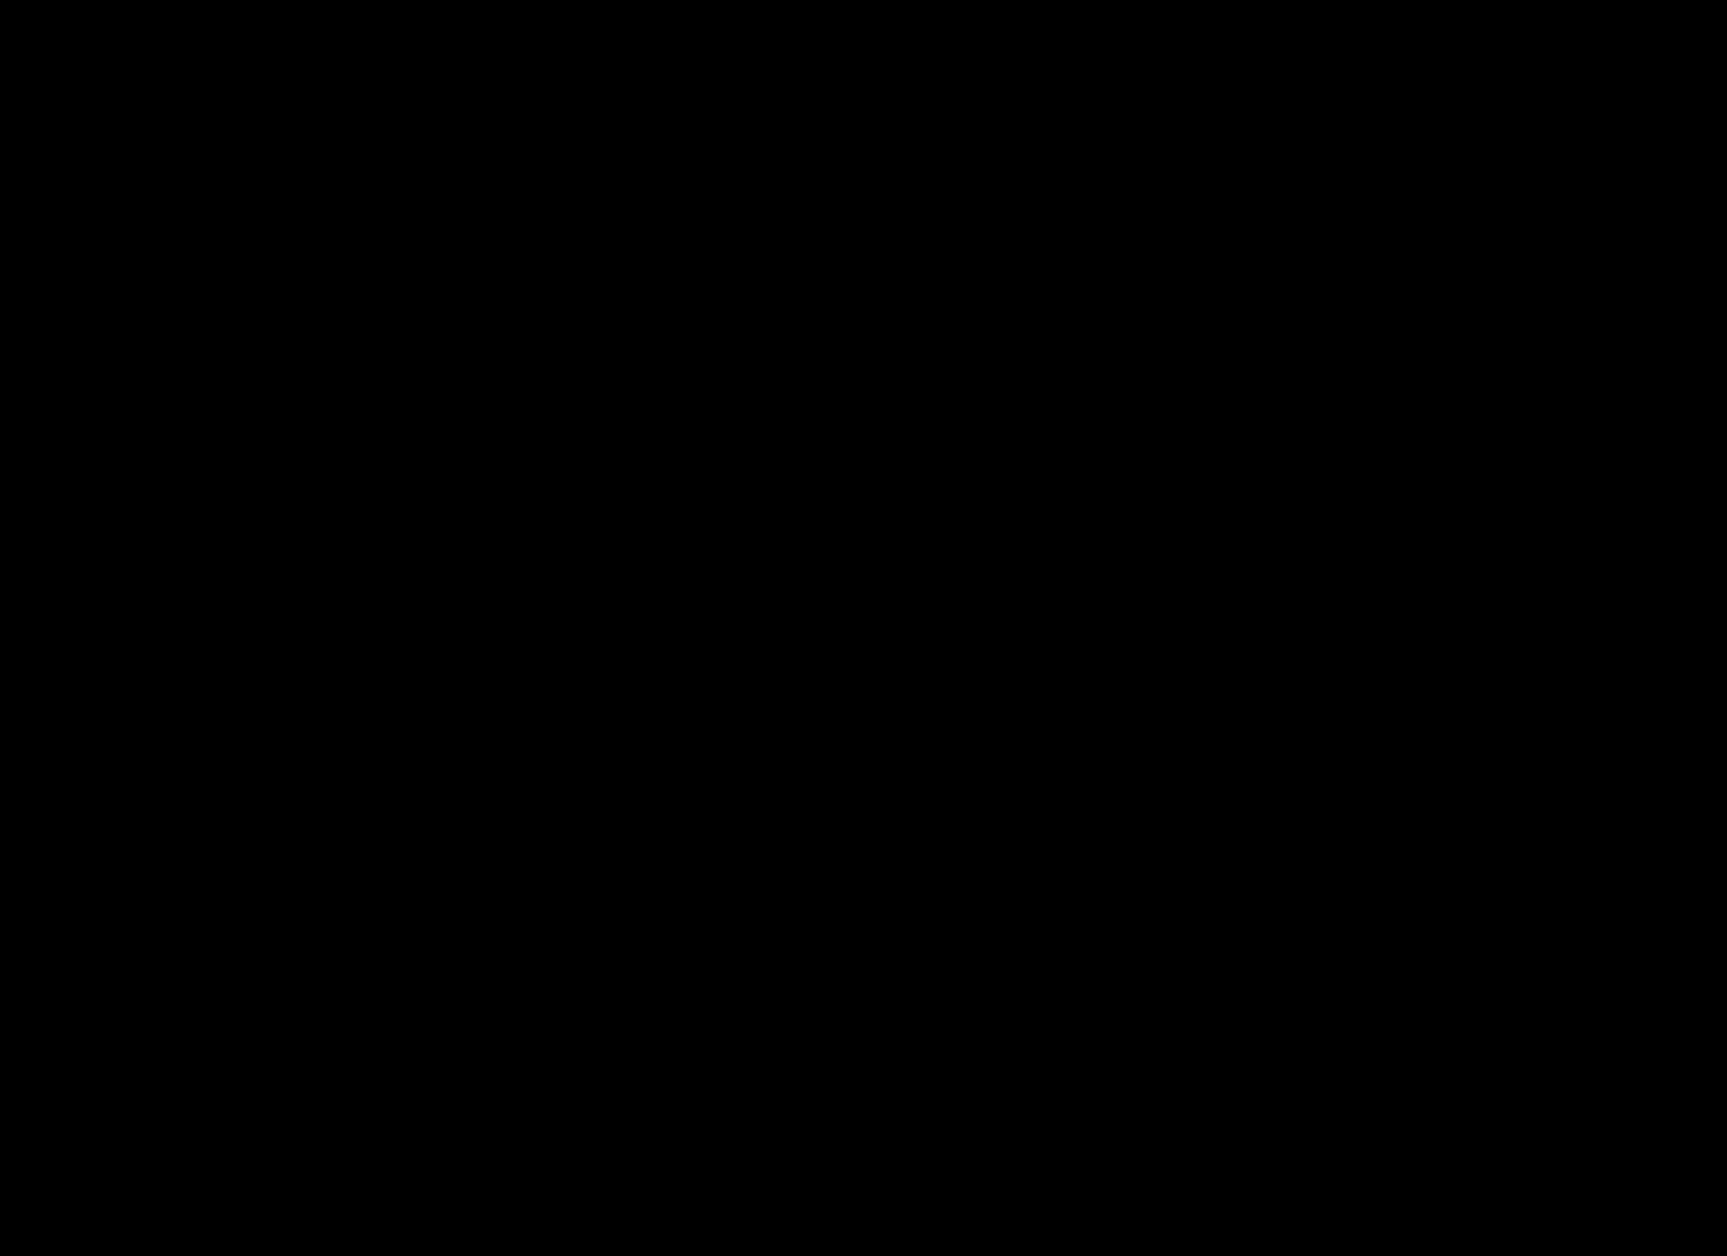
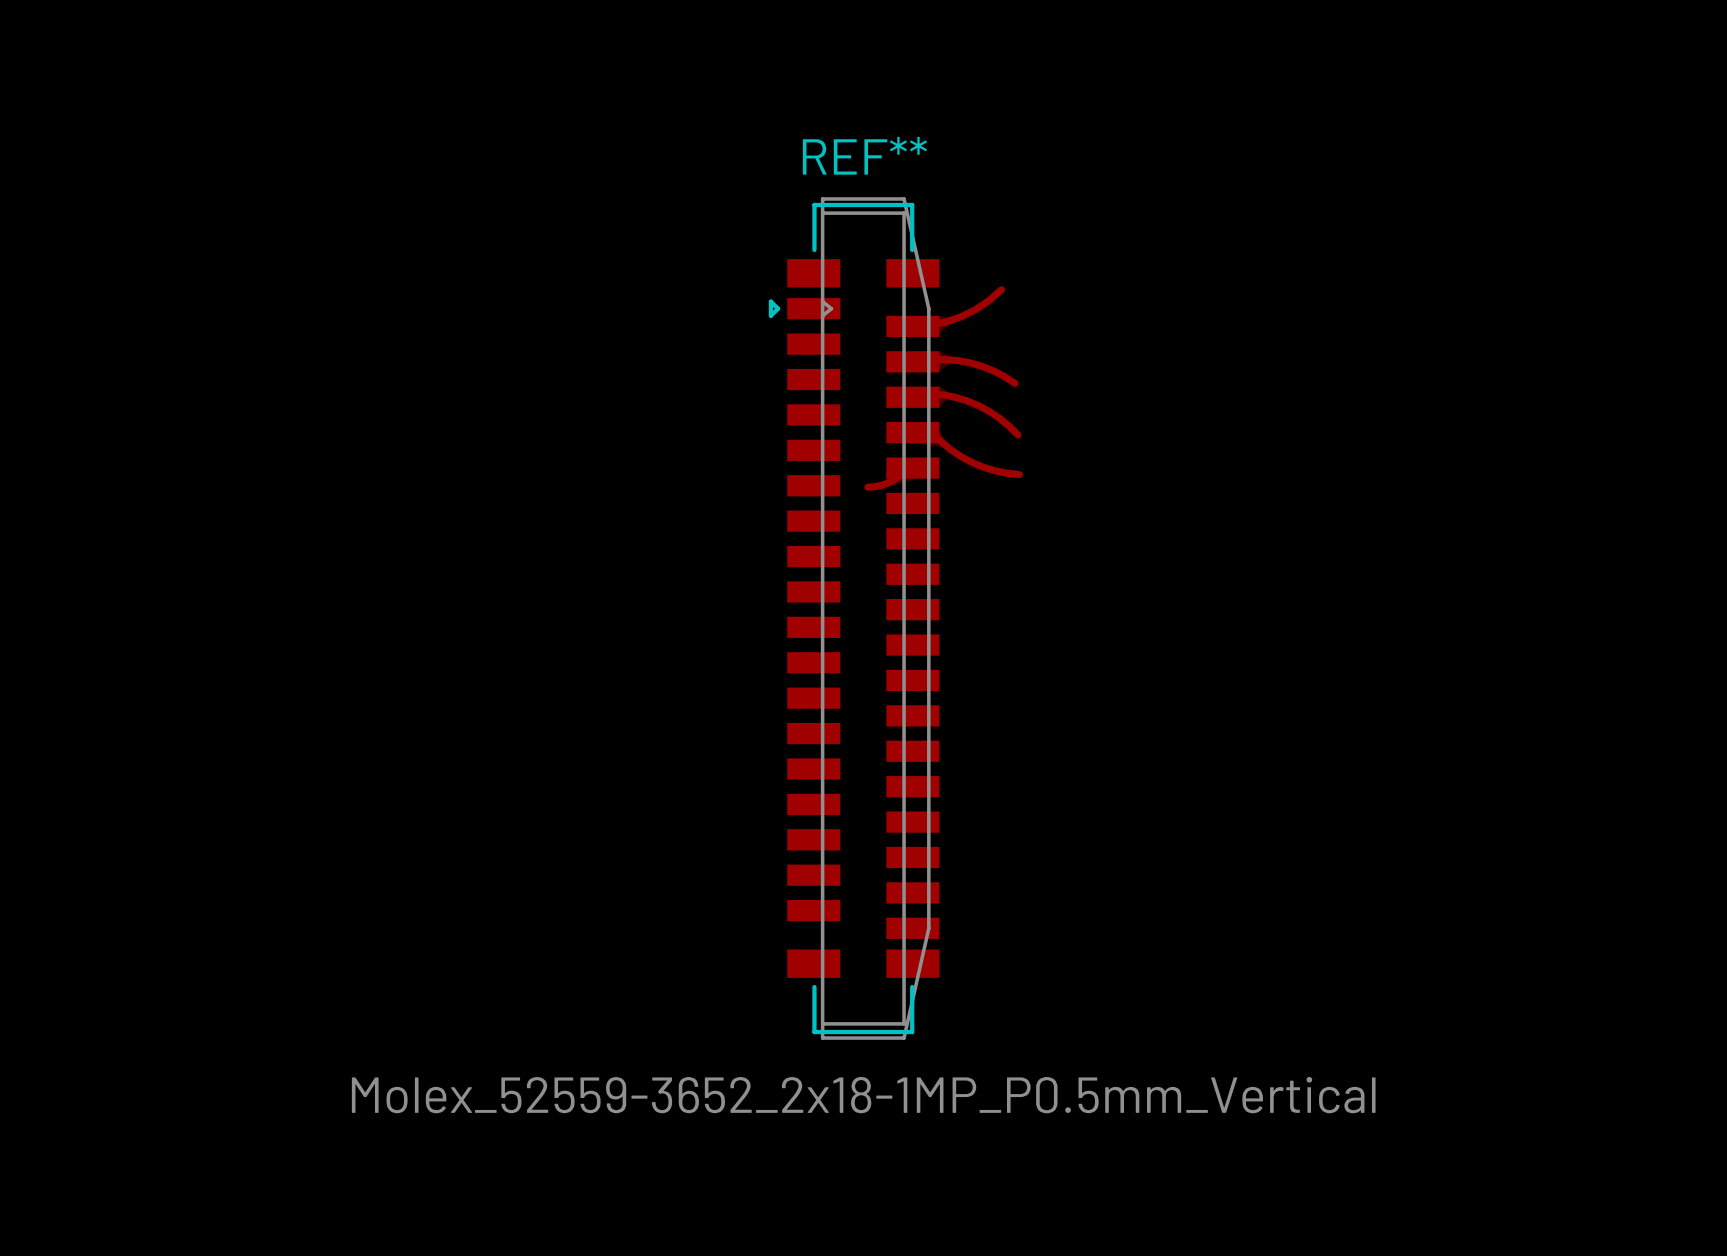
track: none -> (1001, 289) (975, 309) (960, 316) (929, 325) (912, 326)
track: none -> (921, 361) (946, 359) (970, 362) (993, 371) (1015, 383)
track: none -> (931, 393) (955, 397) (978, 405) (999, 418) (1017, 435)
track: none -> (932, 433) (951, 449) (972, 462) (995, 470) (1019, 474)
track: none -> (903, 472) (887, 483) (867, 487)
REF**: none -> Molex_52559-3652_2x18-1MP_P0.5mm_Vertical (854, 618)

